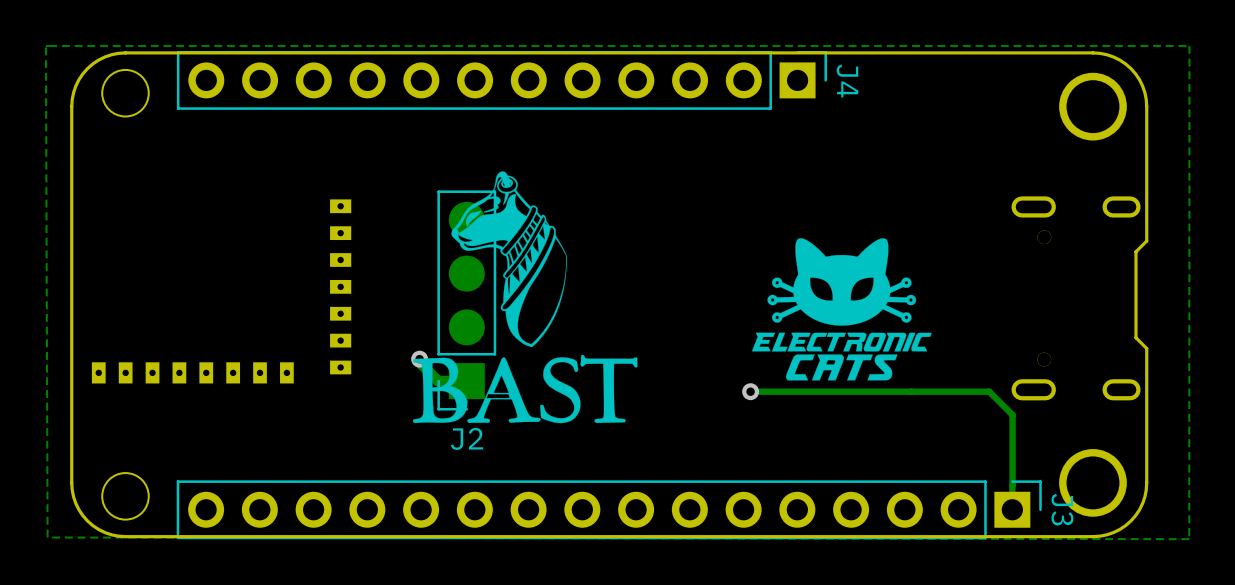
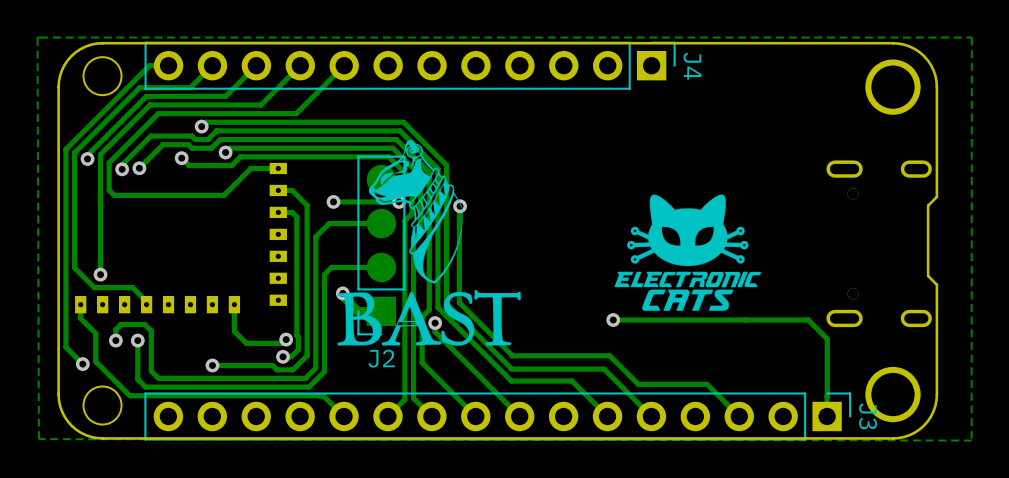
track: none -> (168, 65) (149, 65) (65, 149) (65, 347) (82, 364)
track: none -> (212, 65) (190, 87) (139, 87) (74, 152) (74, 267) (94, 287) (132, 287) (146, 301) (146, 304)
track: none -> (256, 65) (225, 96) (146, 96) (87, 155) (87, 158)
track: none -> (300, 65) (261, 104) (150, 104) (100, 154) (100, 274)
track: none -> (344, 65) (296, 113) (158, 113) (109, 162) (109, 190) (114, 195) (224, 195) (250, 168) (278, 168)
track: none -> (201, 126) (206, 122) (403, 122) (446, 165) (446, 303) (511, 369) (604, 369) (651, 416)
via: none -> (201, 126)
track: none -> (225, 152) (229, 148) (392, 148) (420, 175) (420, 231) (413, 238) (413, 398) (431, 416)
via: none -> (225, 152)
track: none -> (181, 158) (189, 165) (231, 165) (240, 156) (388, 156) (412, 180) (412, 213) (404, 220) (404, 399) (387, 416)
via: none -> (181, 158)
via: none -> (87, 158)
track: none -> (139, 168) (162, 144) (188, 144) (191, 148) (211, 148) (220, 139) (396, 139) (429, 172) (429, 309) (422, 317) (422, 362) (475, 416)
via: none -> (139, 168)
track: none -> (122, 169) (122, 164) (150, 136) (191, 136) (195, 139) (207, 139) (216, 130) (400, 130) (437, 168) (437, 307) (511, 381) (572, 381) (607, 416)
via: none -> (122, 169)
track: none -> (278, 190) (292, 190) (307, 205) (307, 355) (293, 369) (276, 369) (272, 365) (212, 365)
via: none -> (333, 201)
track: none -> (399, 201) (333, 201)
via: none -> (399, 201)
track: none -> (460, 206) (459, 302) (511, 355) (609, 355) (638, 384) (707, 384) (739, 416)
via: none -> (460, 206)
track: none -> (278, 212) (292, 212) (296, 217) (298, 349) (291, 356) (283, 356)
track: none -> (381, 223) (329, 223) (315, 236) (315, 368) (305, 378) (158, 378) (151, 371) (151, 330) (144, 324) (121, 324) (115, 329) (115, 340)
track: none -> (381, 267) (331, 267) (324, 274) (324, 371) (309, 387) (145, 387) (137, 379) (137, 340)
via: none -> (100, 274)
track: none -> (80, 304) (80, 318) (95, 333) (95, 361) (129, 395) (323, 395) (344, 416)
track: none -> (234, 304) (234, 331) (246, 343) (285, 343)
track: none -> (435, 323) (435, 331) (519, 416)
via: none -> (435, 323)
via: none -> (286, 339)
via: none -> (115, 340)
via: none -> (137, 340)
via: none -> (283, 356)
via: none -> (82, 364)
via: none -> (212, 365)

